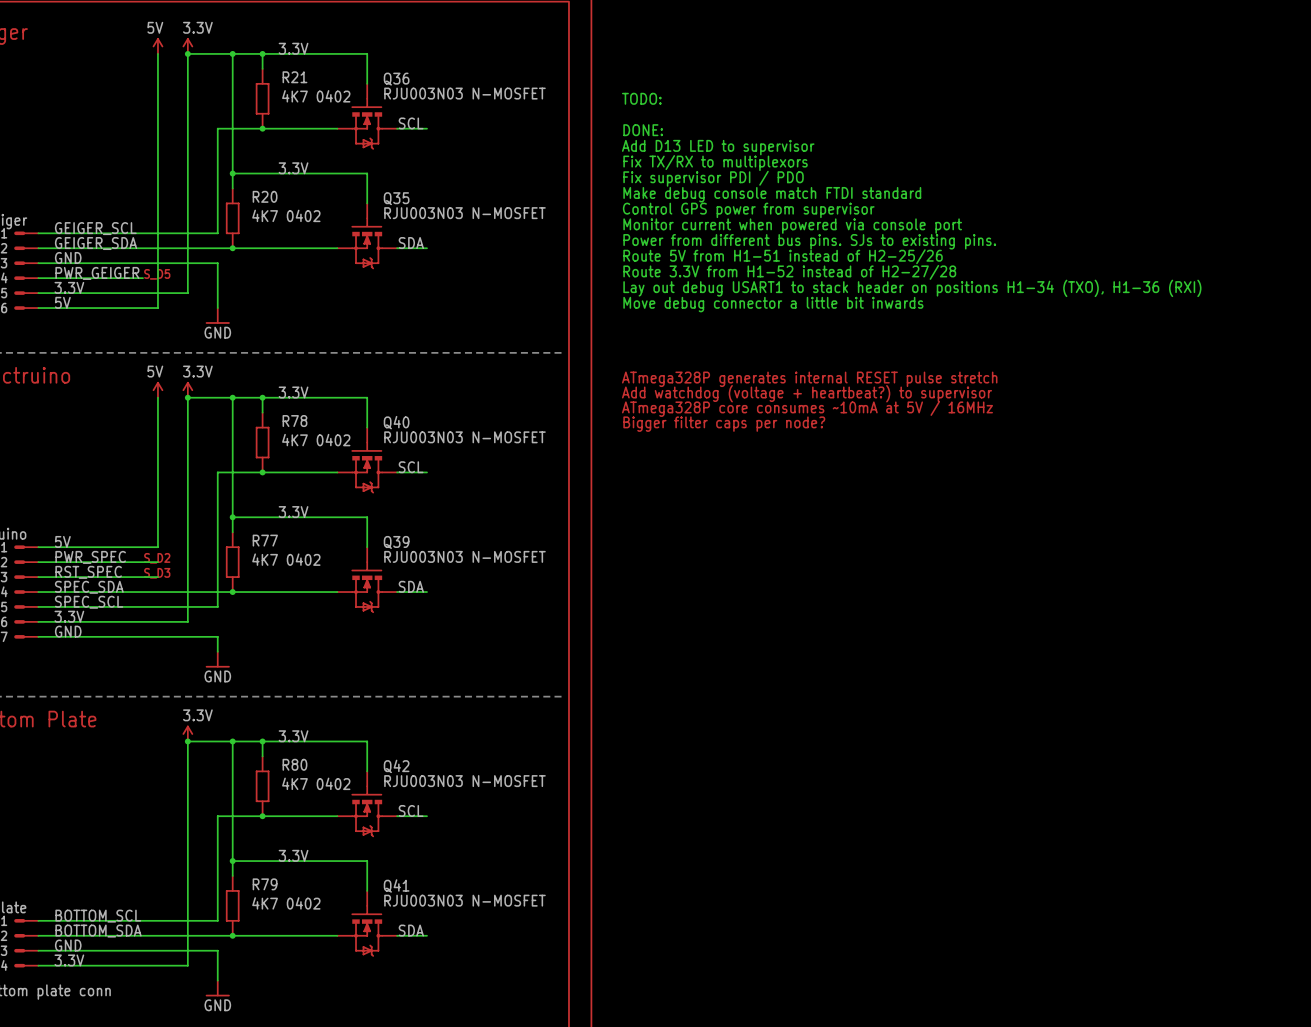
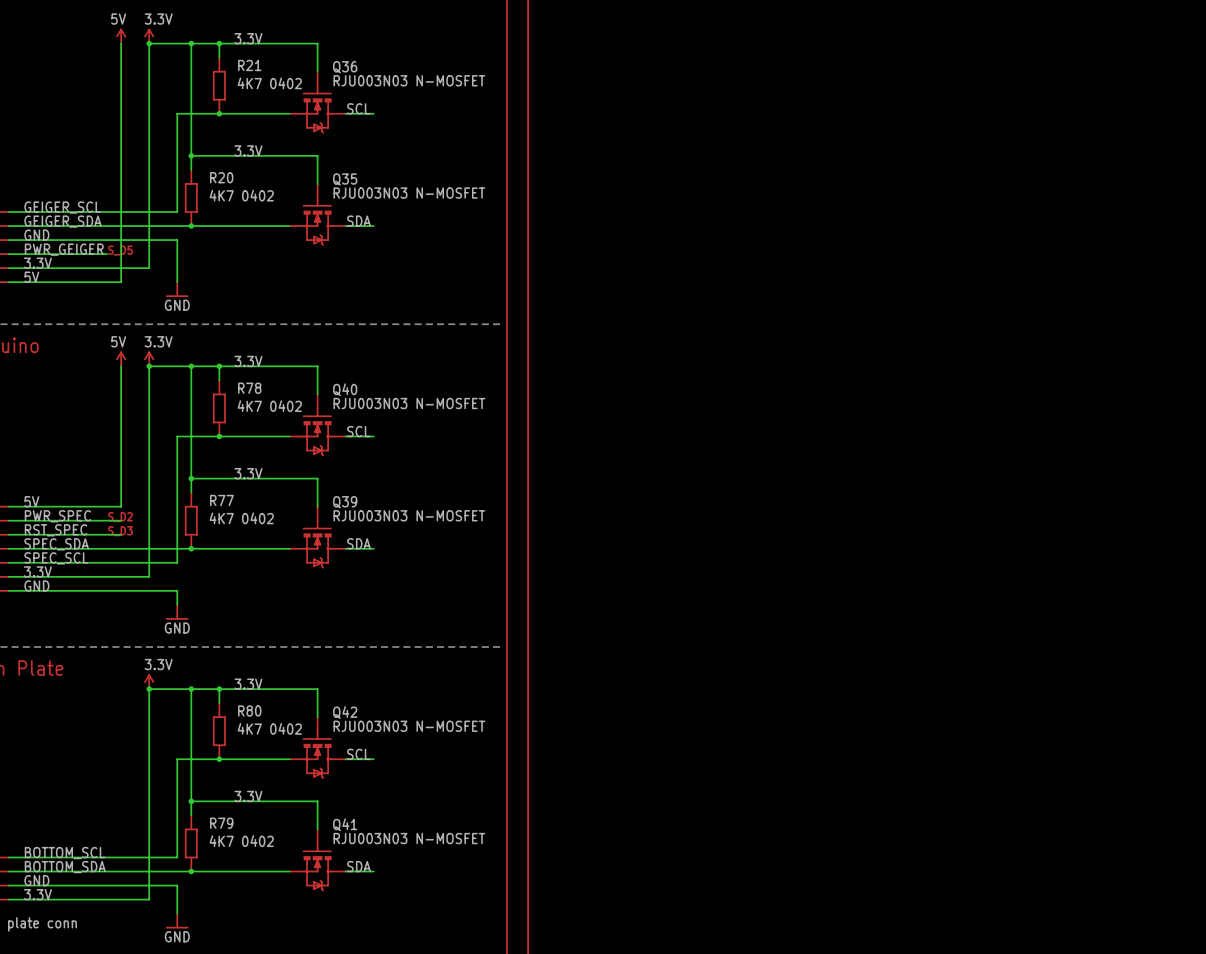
text: TODO: (641, 98) -> none
text: DONE: (643, 130) -> none
text: Add D13 LED to supervisor (718, 147) -> none
text: Fix TX/RX to multiplexors (715, 163) -> none
text: Fix supervisor PDI / PDO (713, 178) -> none
text: Make debug console match FTDI standard (772, 194) -> none
text: Control GPS power from supervisor (748, 210) -> none
text: Monitor current when powered via console port (792, 226) -> none
text: Power from different bus pins. SJs to existing pins. (809, 241) -> none
text: Route 5V from H1-51 instead of H2-25/26 (783, 256) -> none
text: Route 3.3V from H1-52 instead of H2-27/28 (789, 272) -> none
text: Lay out debug USART1 to stack header on positions H1-34 (TXO), H1-36 (RXI) (912, 288) -> none
text: Move debug connector a little bit inwards (773, 304) -> none
text: ATmega328P generates internal RESET pulse stretch (809, 379) -> none
text: Add watchdog (voltage + heartbeat?) to supervisor (807, 393) -> none
text: ATmega328P core consumes ~10mA at 5V / 16MHz (807, 408) -> none
text: Bigger filter caps per node? (724, 424) -> none

